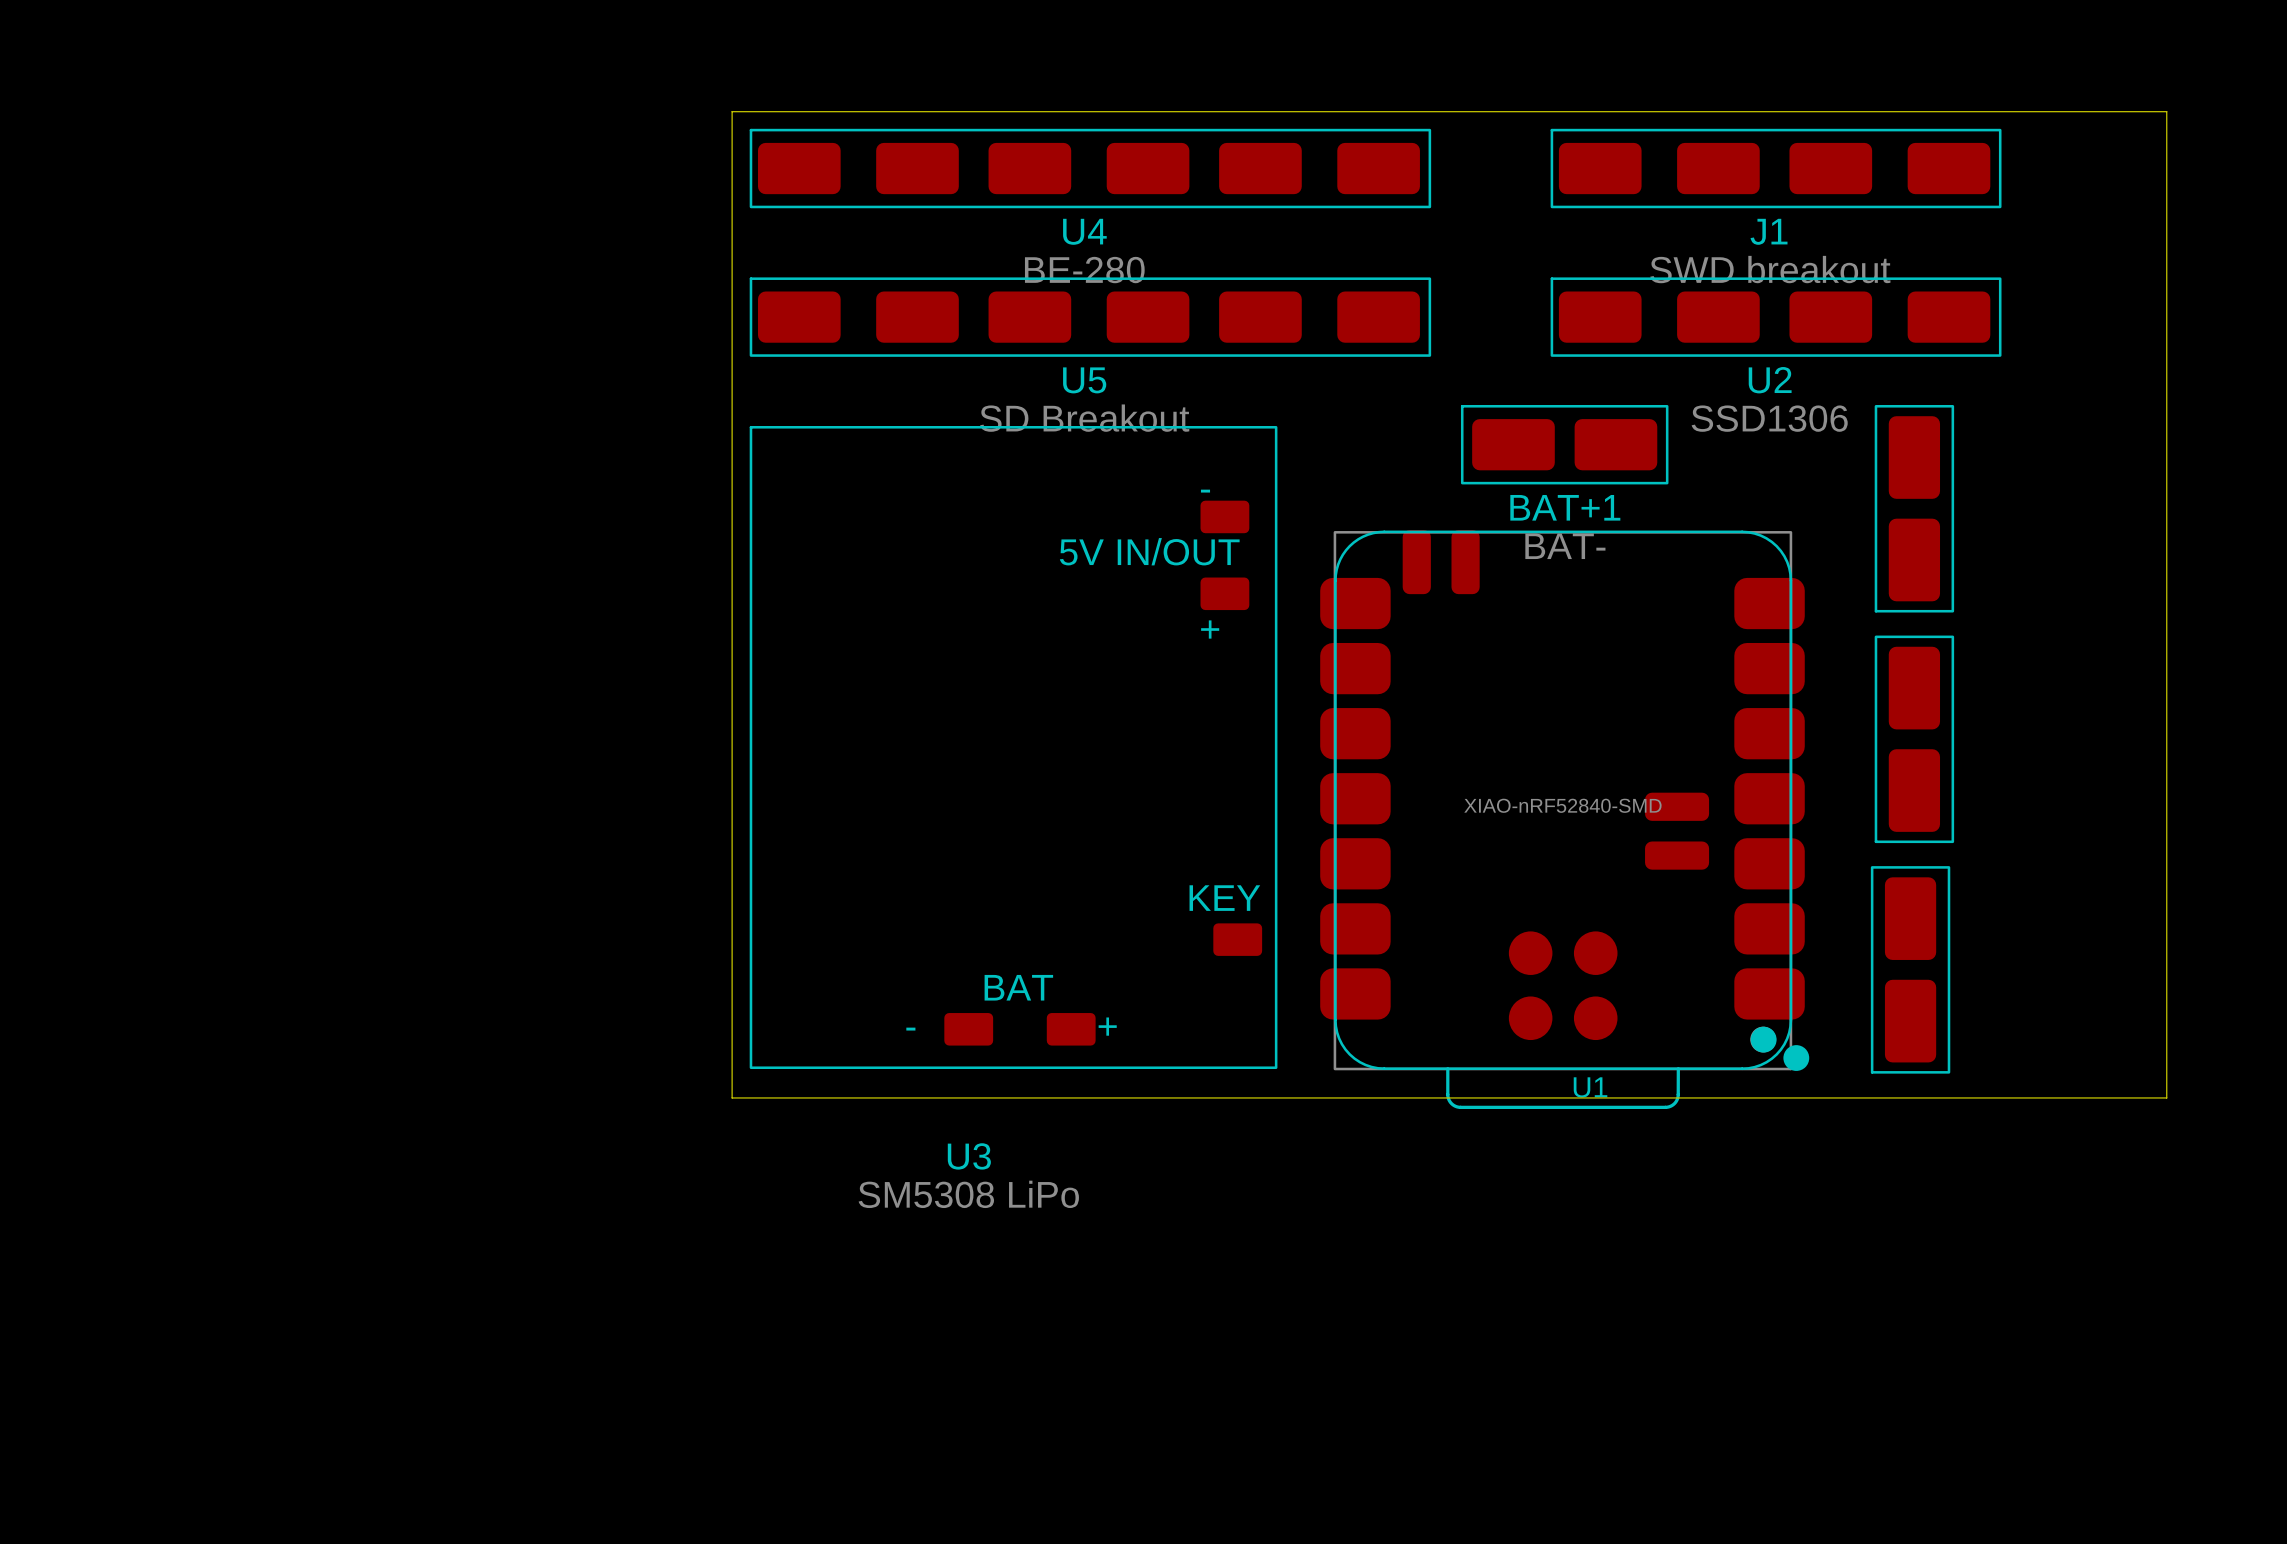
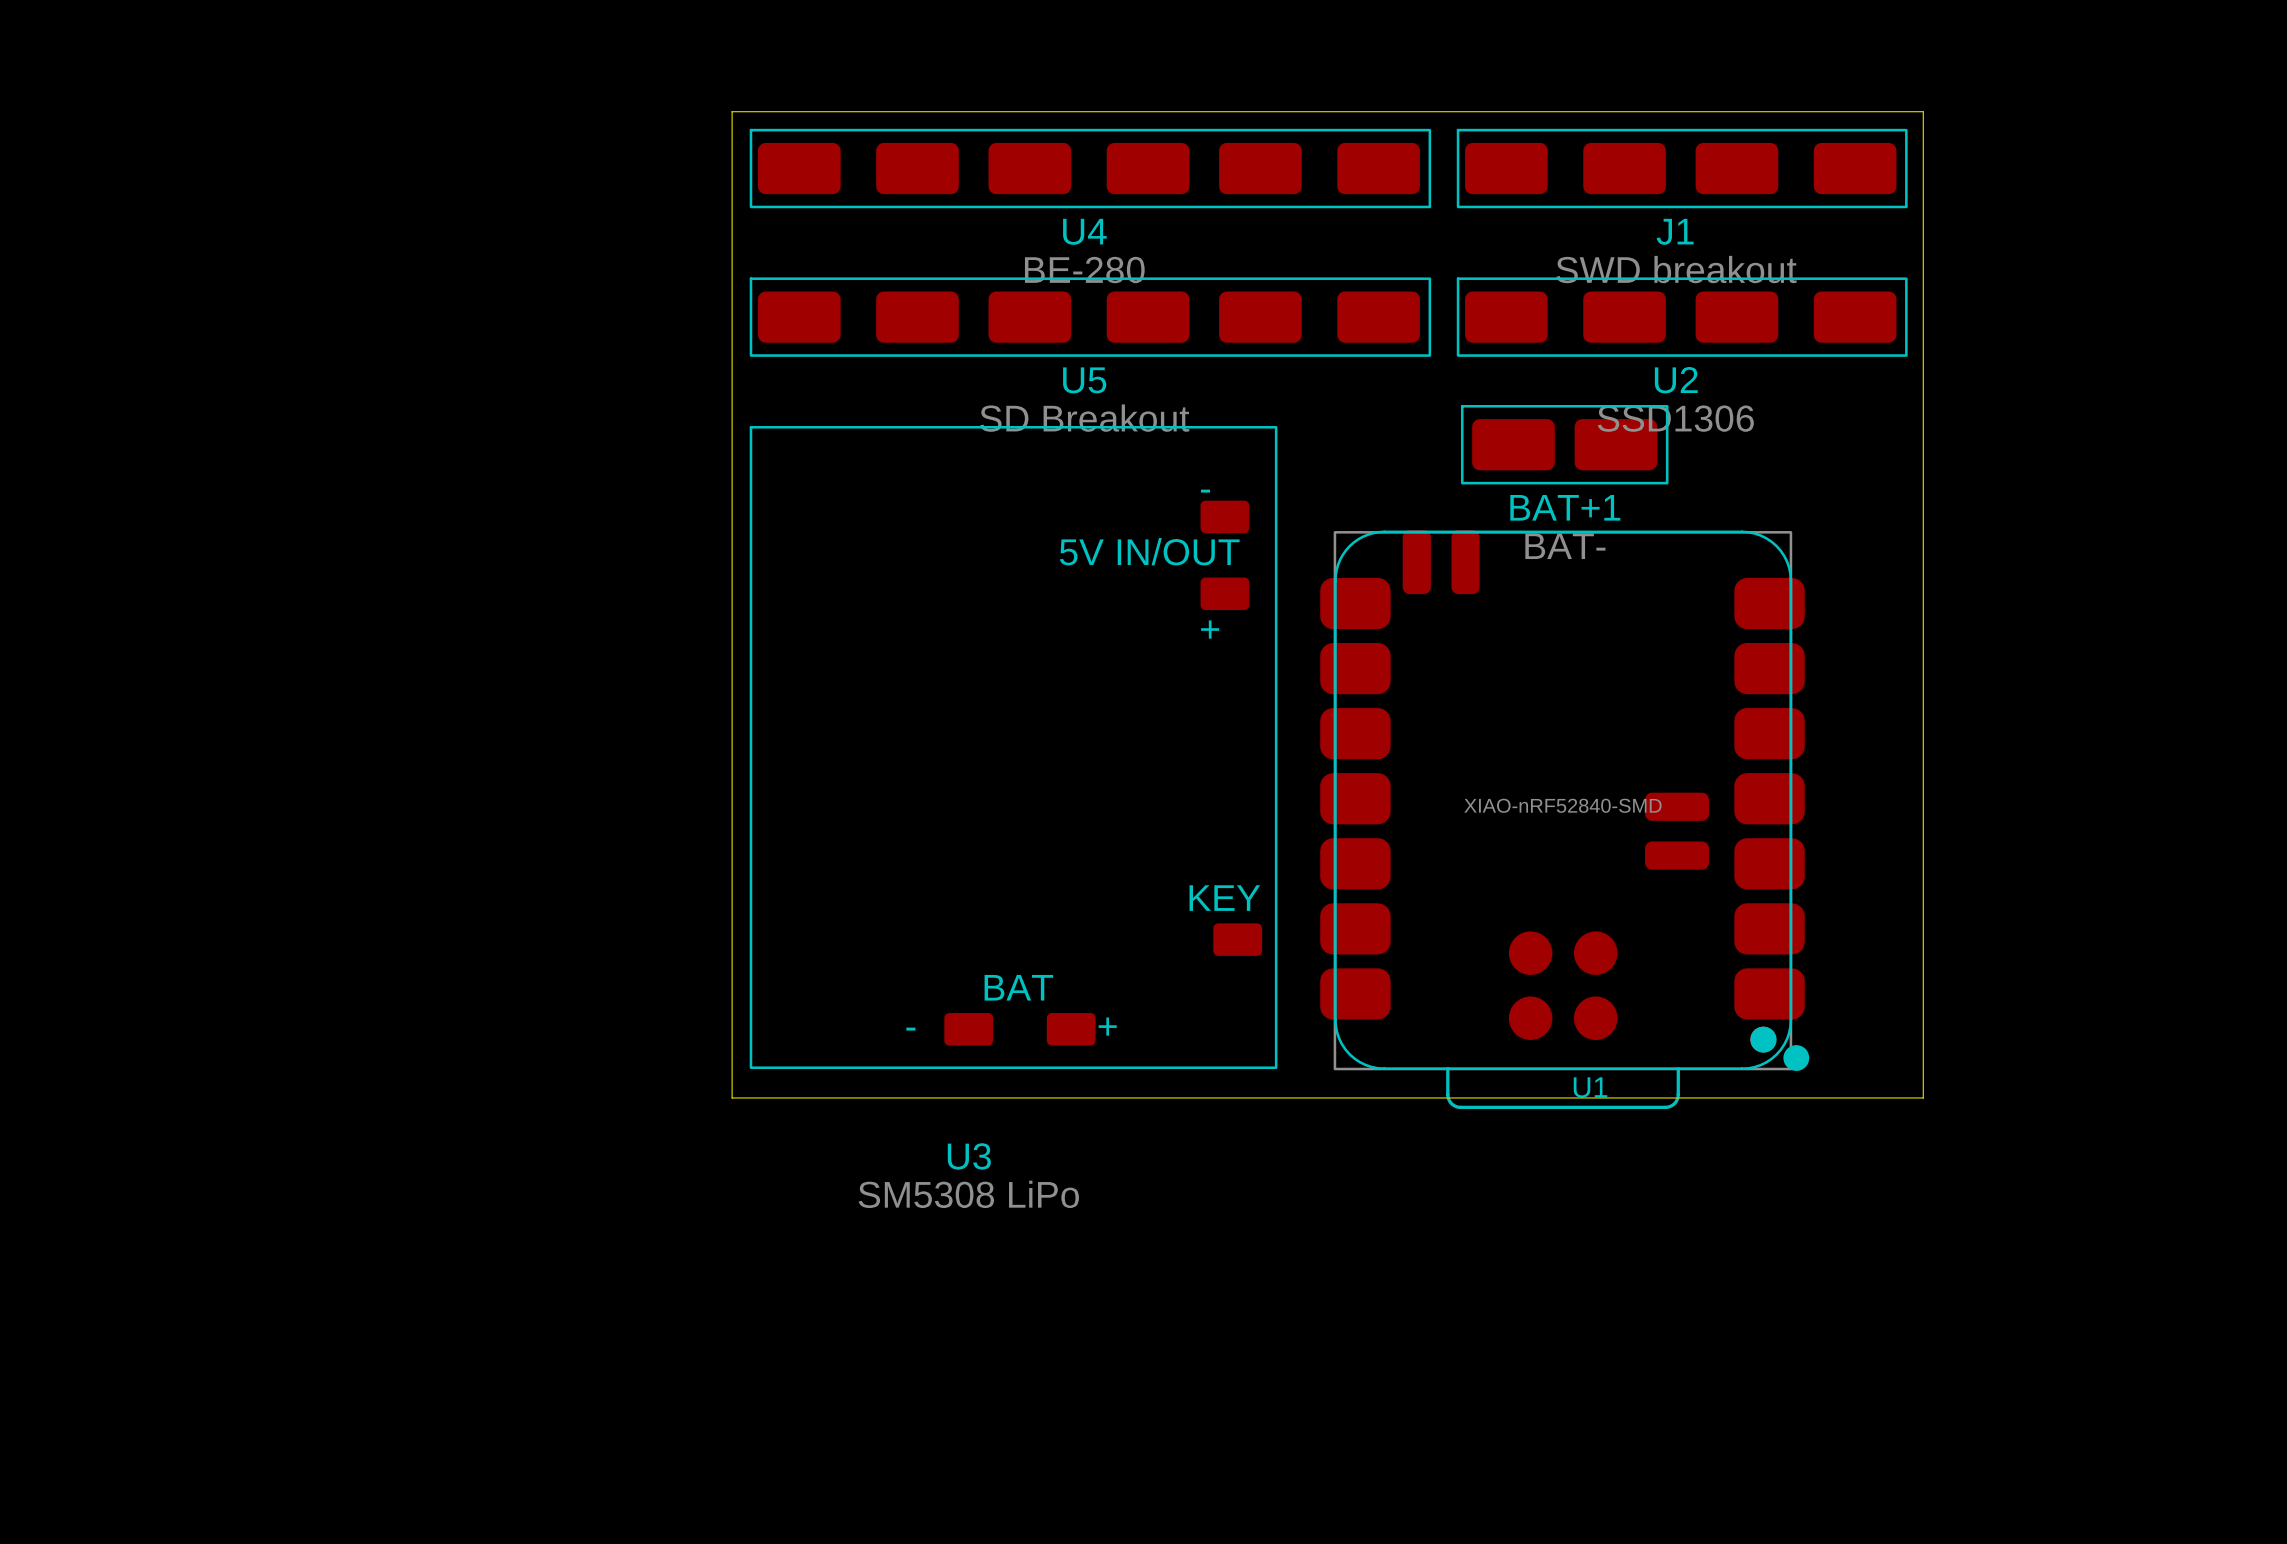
board edge: (1923, 111) (2166, 111) (2166, 1097) (1923, 1097) -> (1923, 111) (1923, 1097)
J1 position: (1776, 168) -> (1682, 168)
U2 position: (1776, 317) -> (1682, 317)
part: (1914, 508) -> none
part: (1914, 739) -> none
part: (1910, 969) -> none

